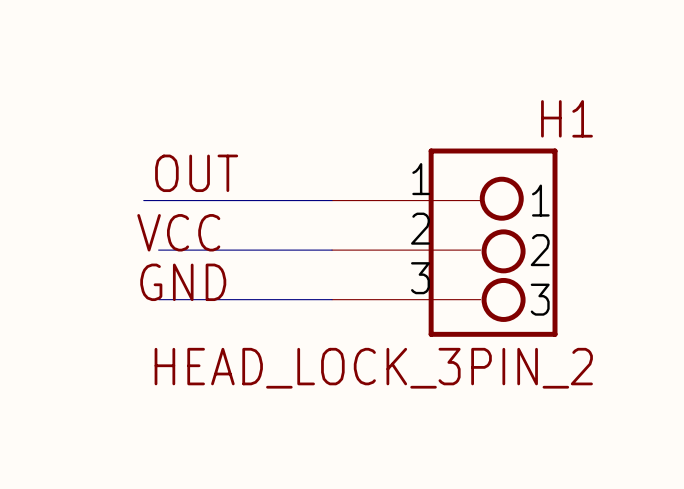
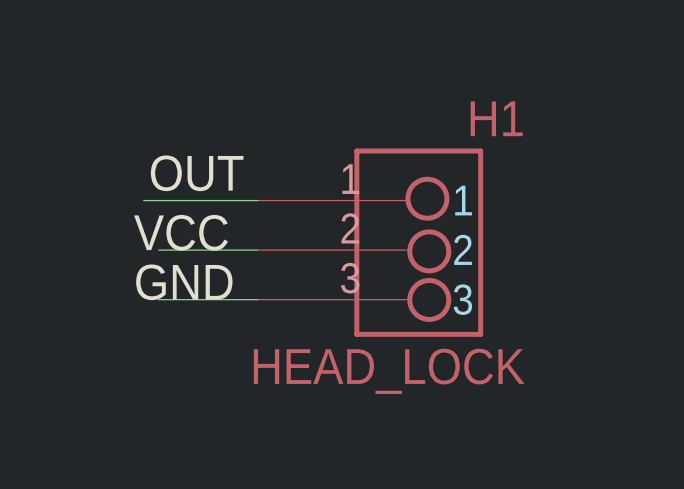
H1 position: (444, 242) -> (370, 242)
H1 value: HEAD_LOCK_3PIN_2 (373, 368) -> HEAD_LOCK (389, 371)

